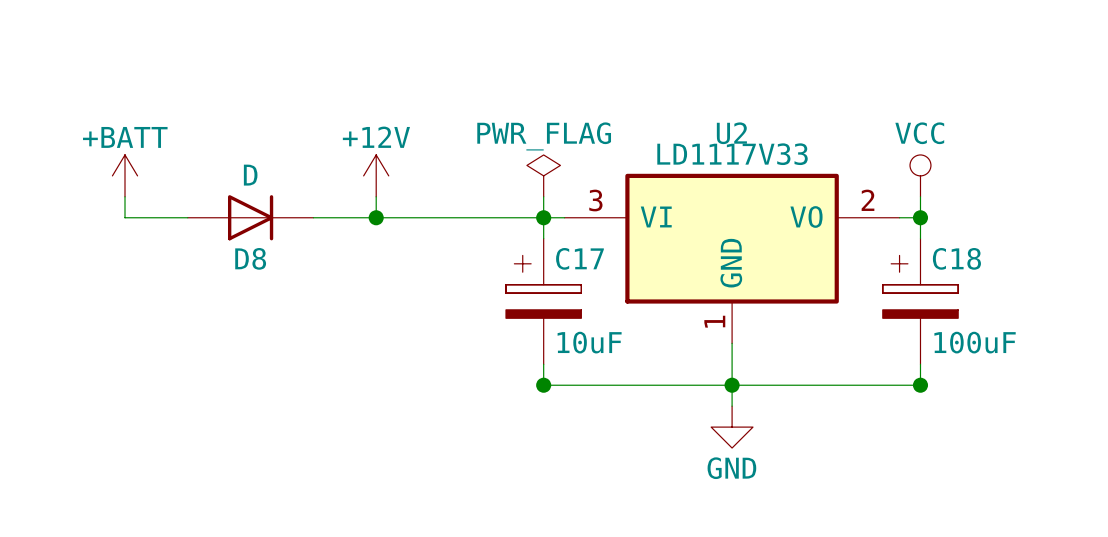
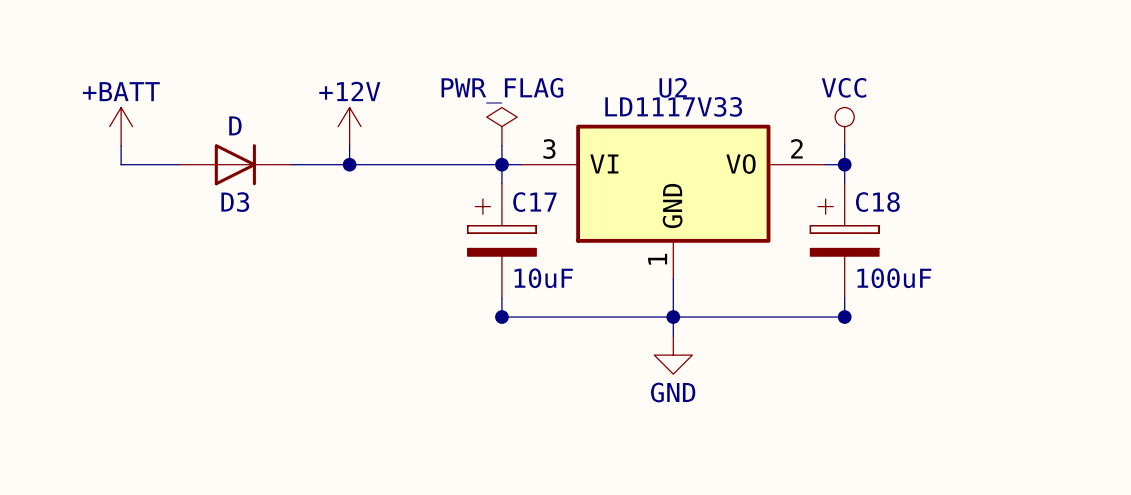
D8 name: D8 (250, 258) -> D3 (235, 202)

